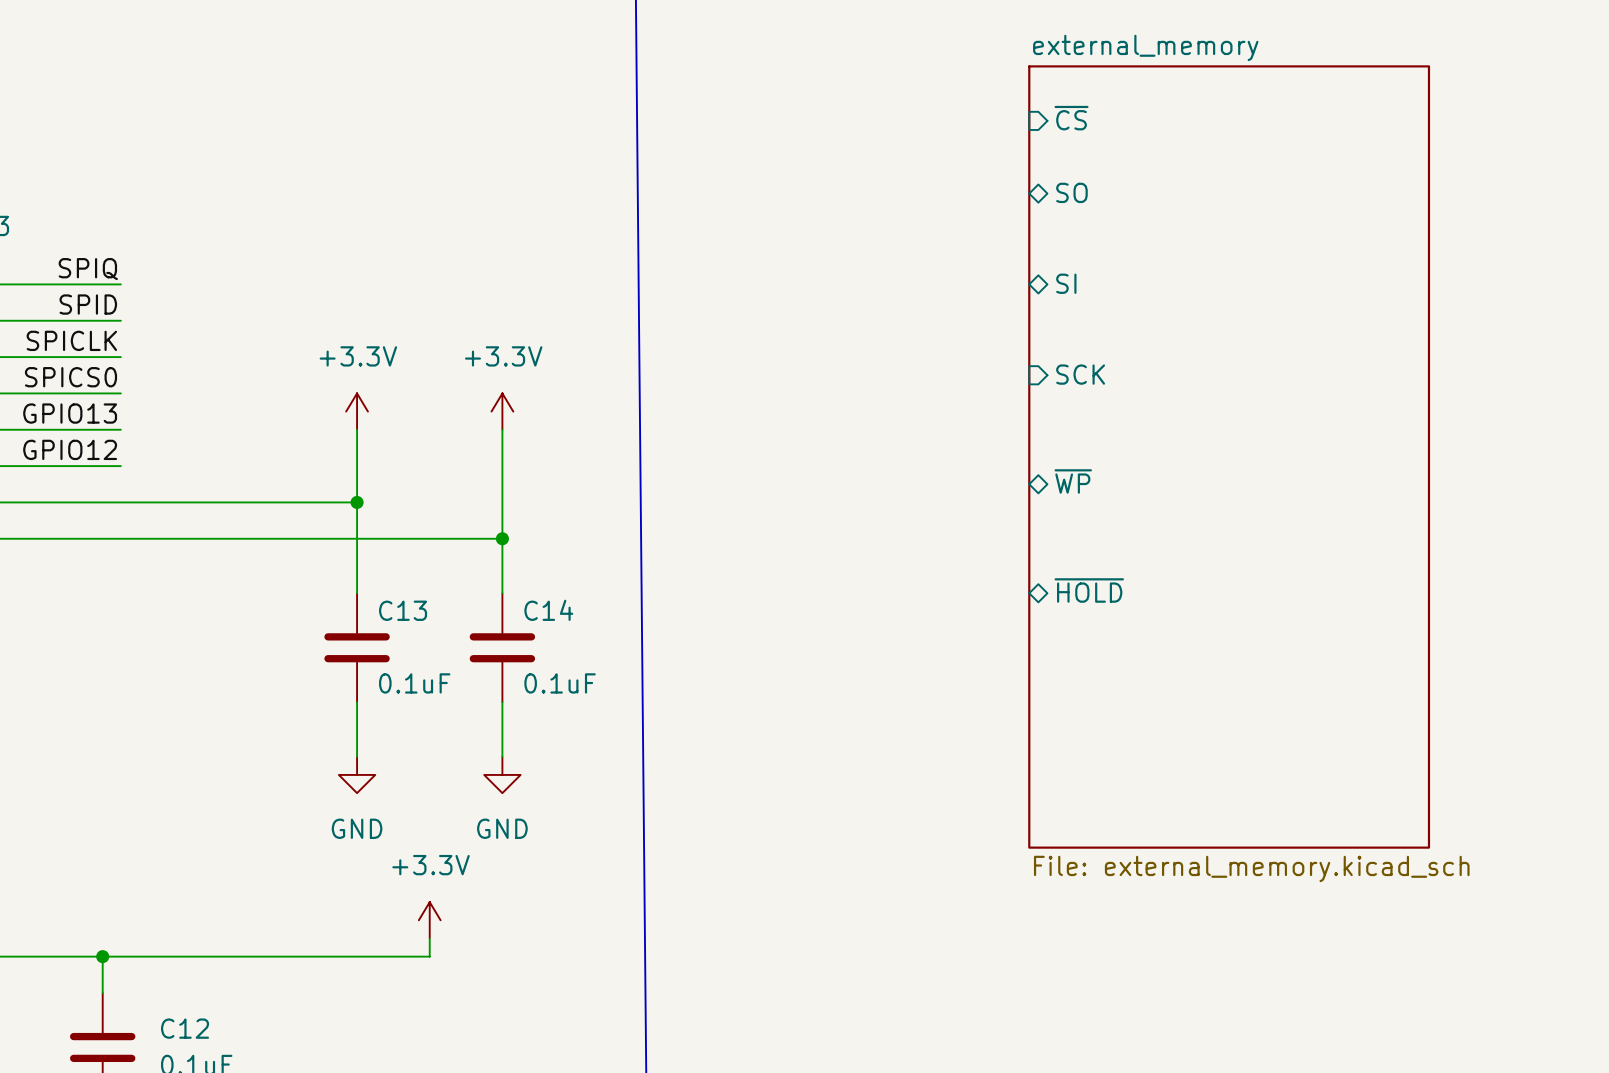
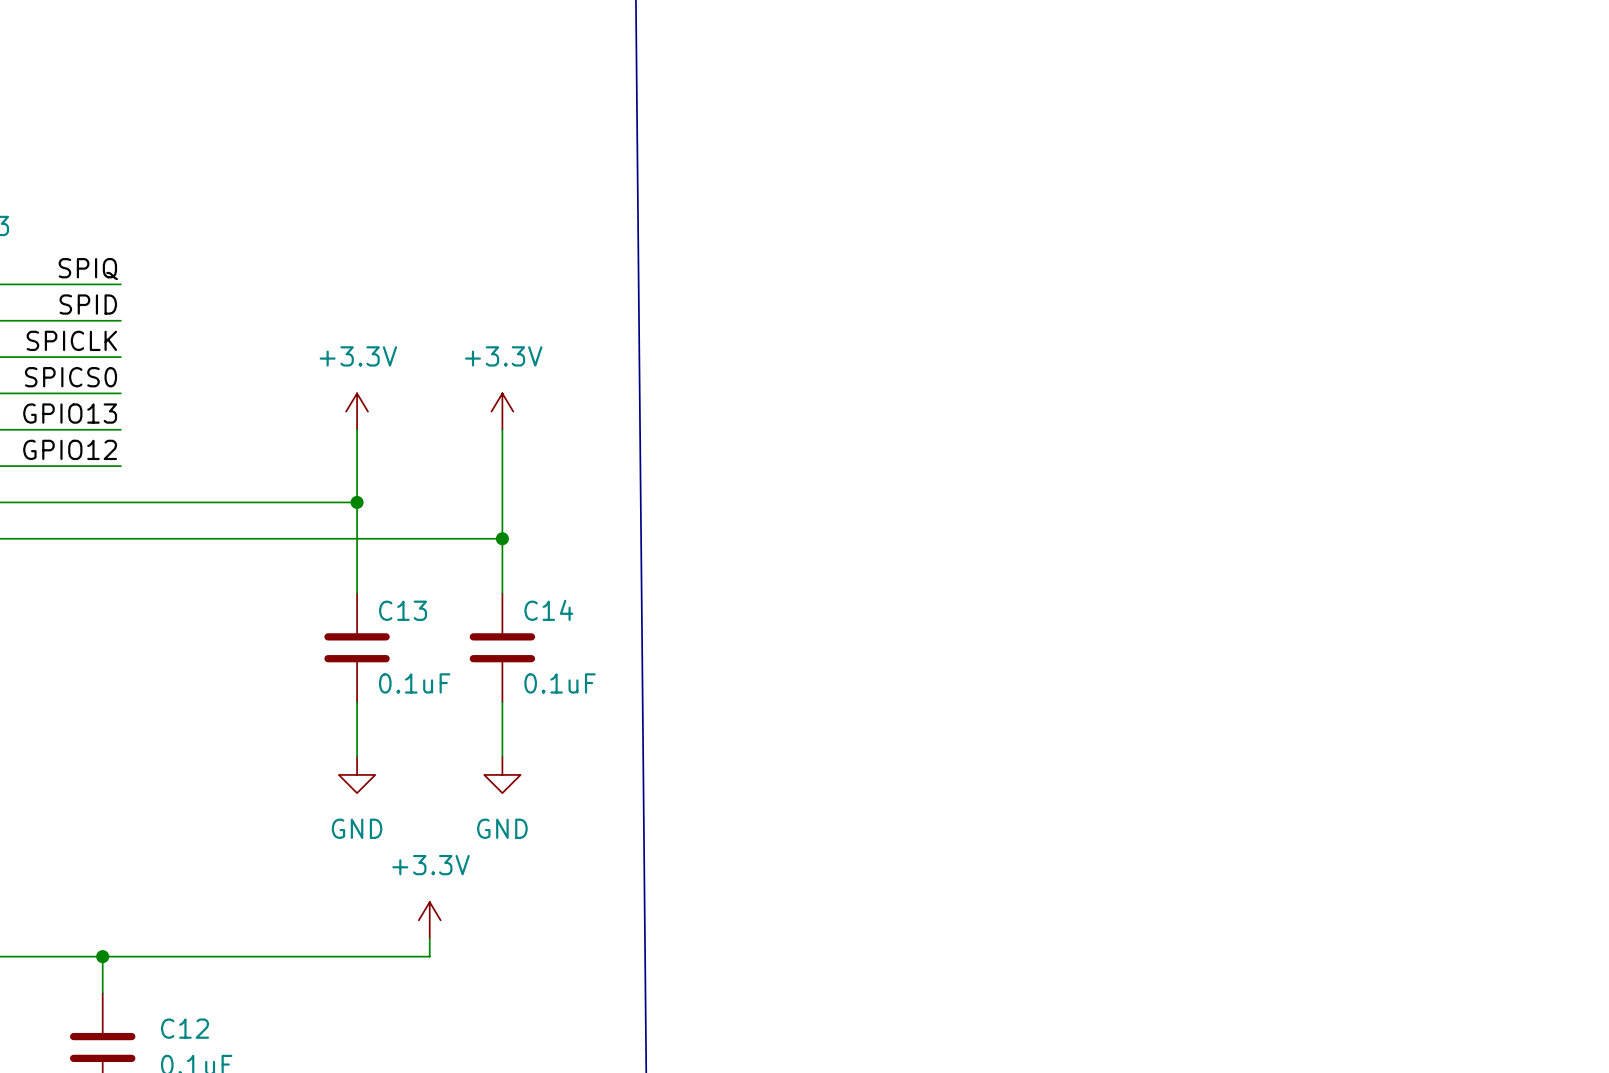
sheet pin: ~{CS} (1071, 118) -> none
sheet pin: SO (1071, 192) -> none
sheet pin: SI (1066, 283) -> none
sheet pin: SCK (1080, 374) -> none
sheet external_memory: File: external_memory.kicad_sch (1229, 457) -> none
sheet pin: ~{WP} (1073, 481) -> none
sheet pin: ~{HOLD} (1089, 590) -> none

